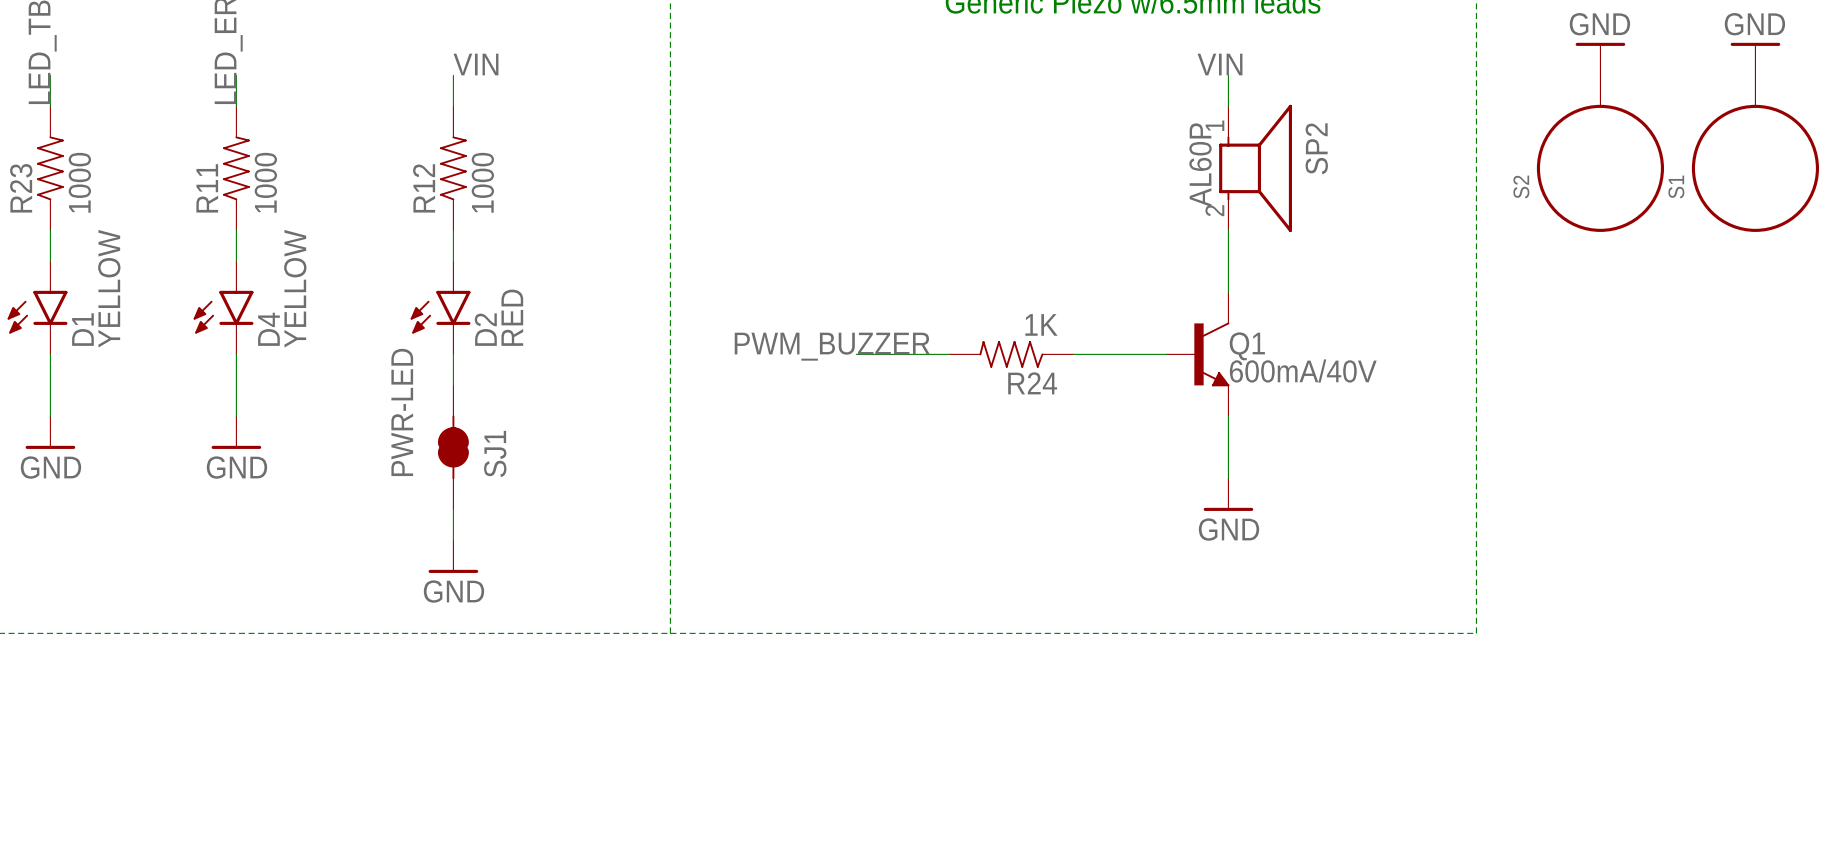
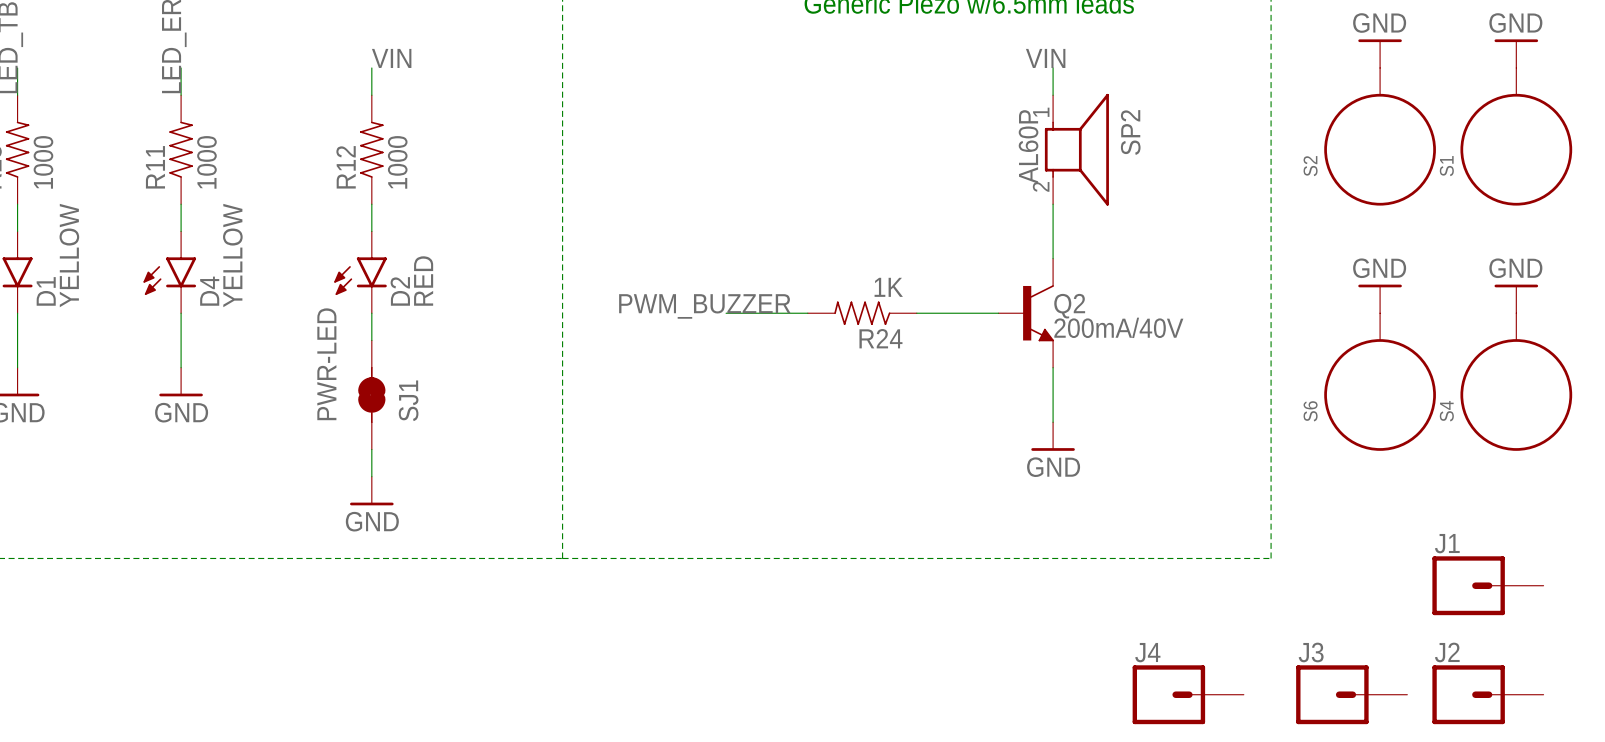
power symbol: none -> GND (1380, 298)
power symbol: none -> GND (1516, 298)
Q1 name: Q1 (1247, 346) -> Q2 (1069, 306)
Q1 value: 600mA/40V (1303, 371) -> 200mA/40V (1118, 327)
S6: none -> (1380, 382)
S4: none -> (1516, 382)
J1: none -> (1487, 585)
J4: none -> (1188, 694)
J3: none -> (1351, 694)
J2: none -> (1487, 694)

